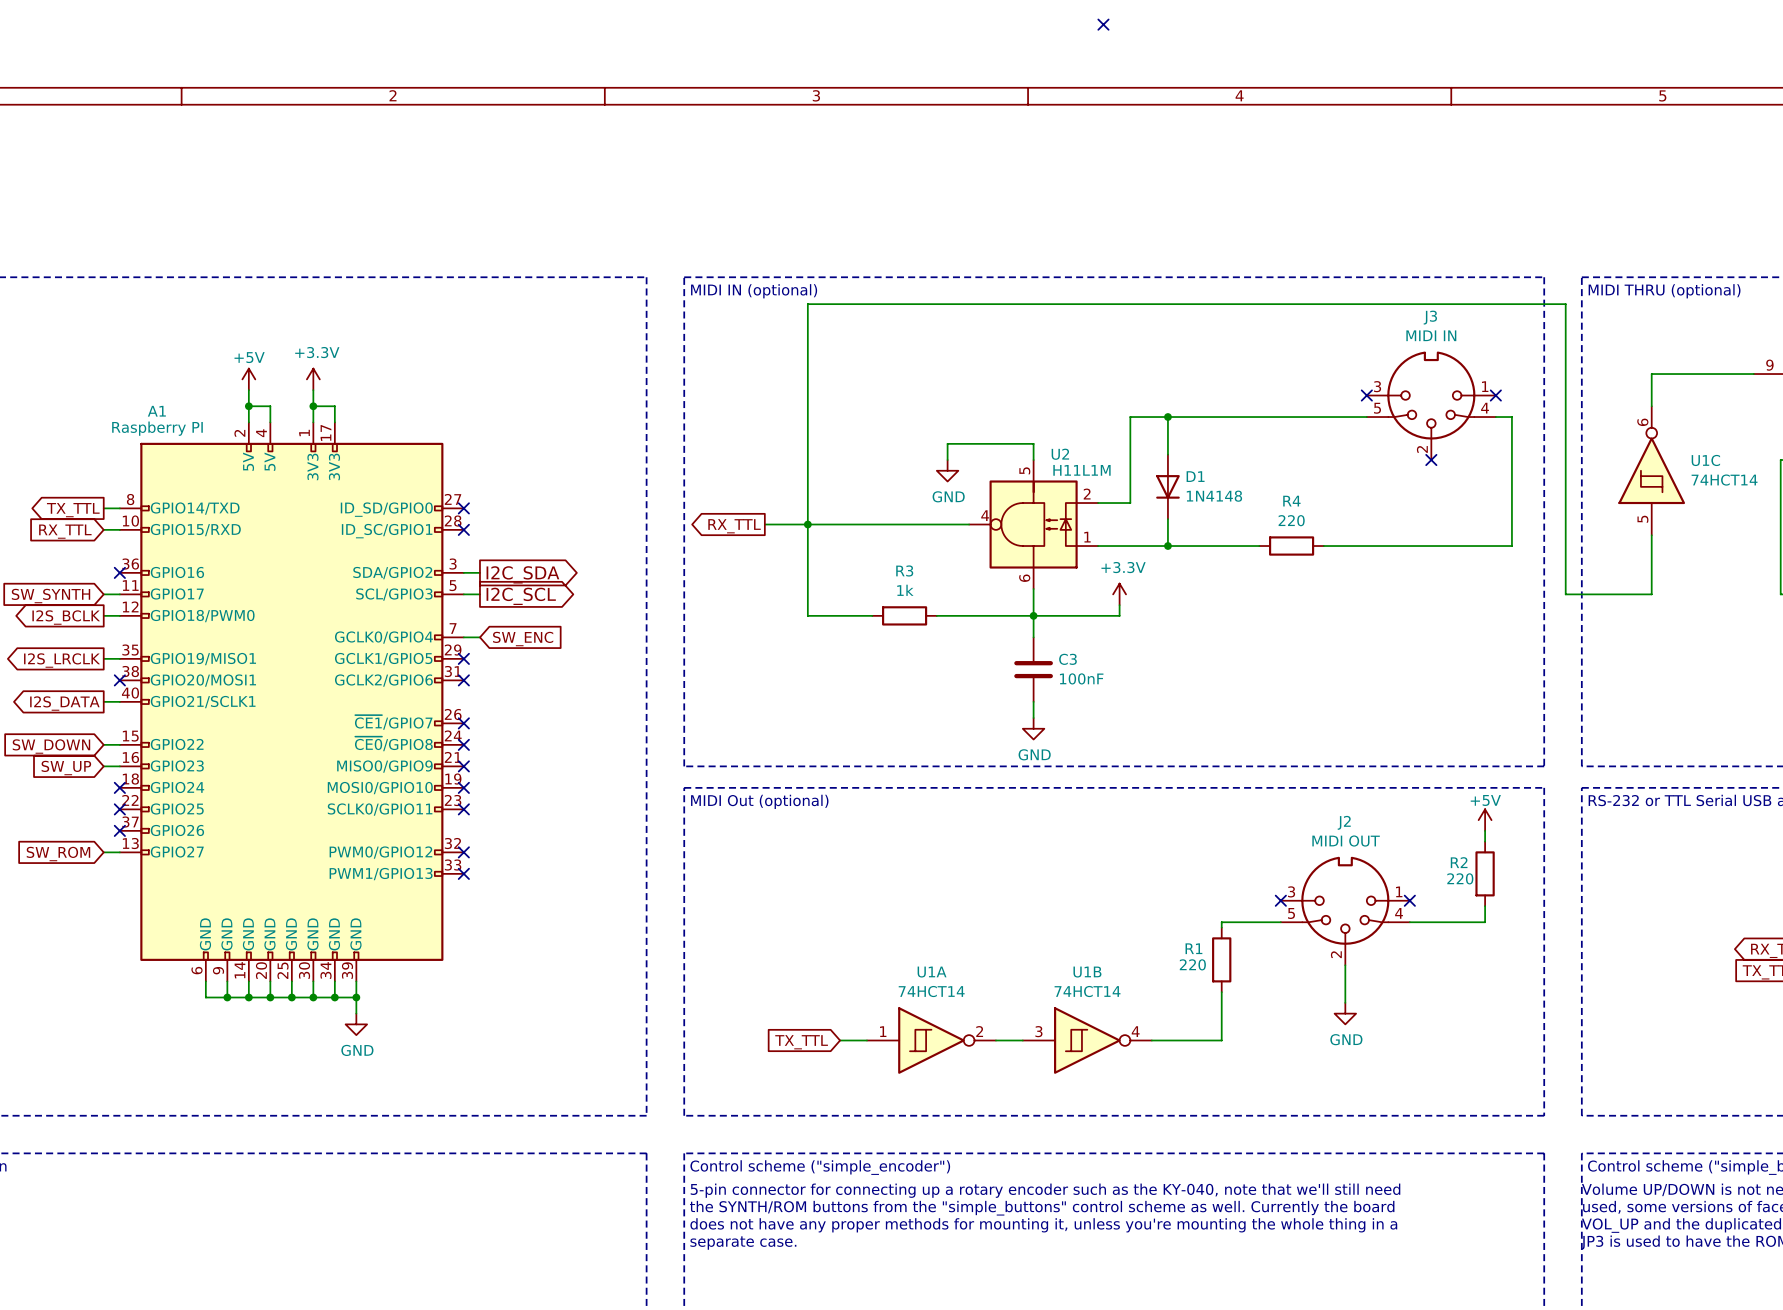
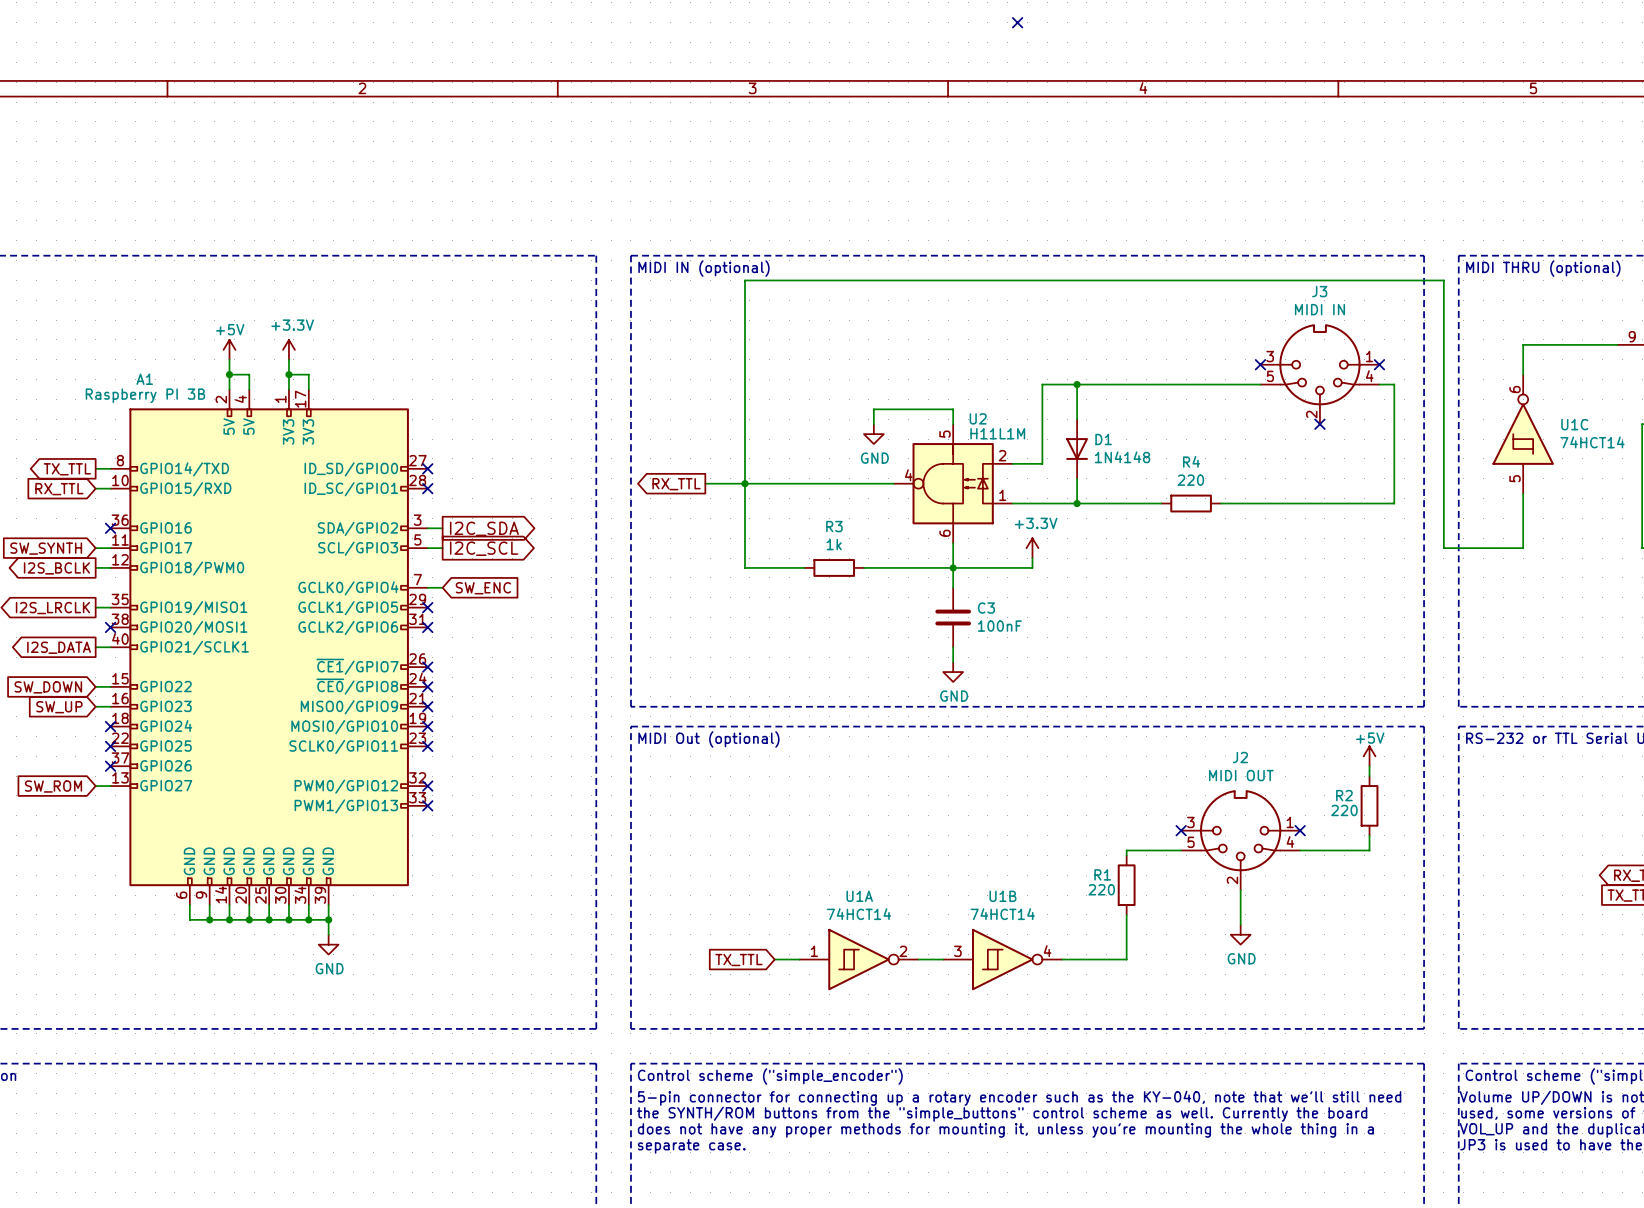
A1 value: Raspberry PI (157, 428) -> Raspberry PI 3B (145, 395)

